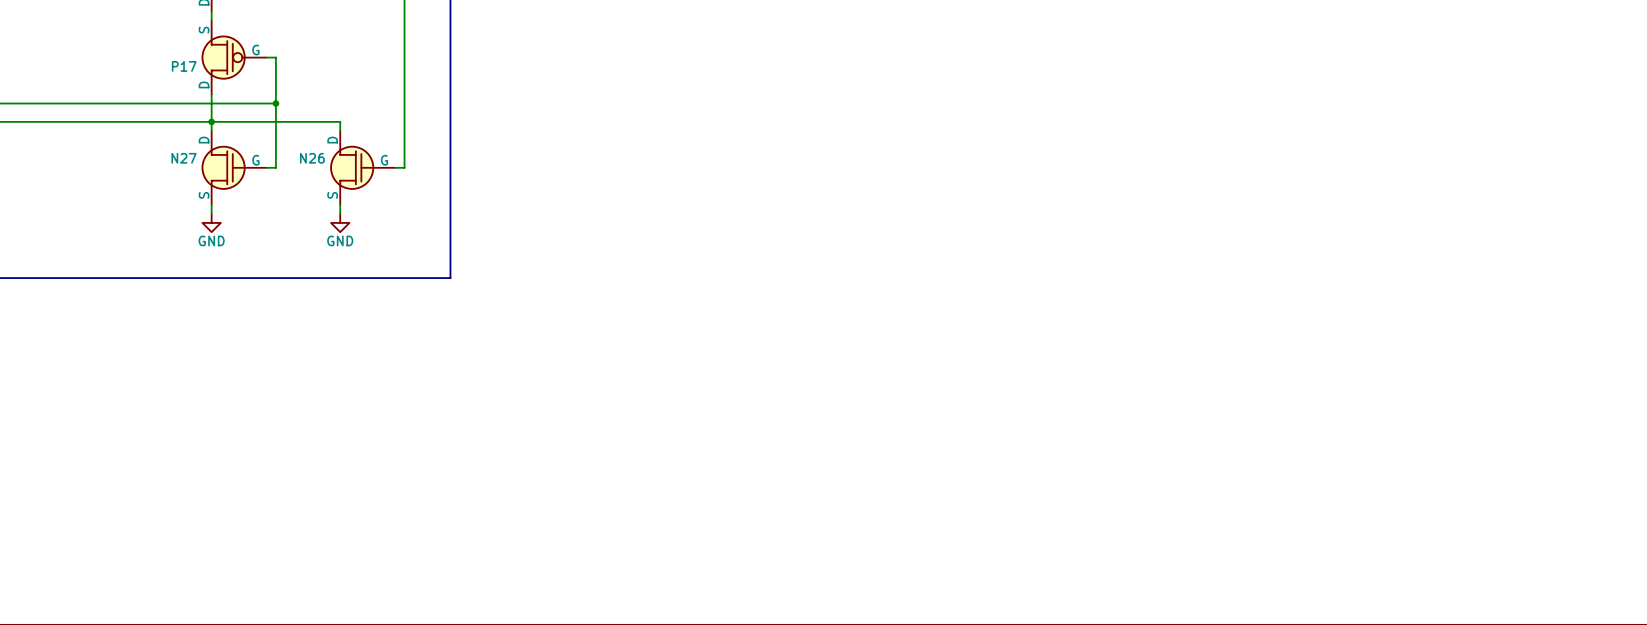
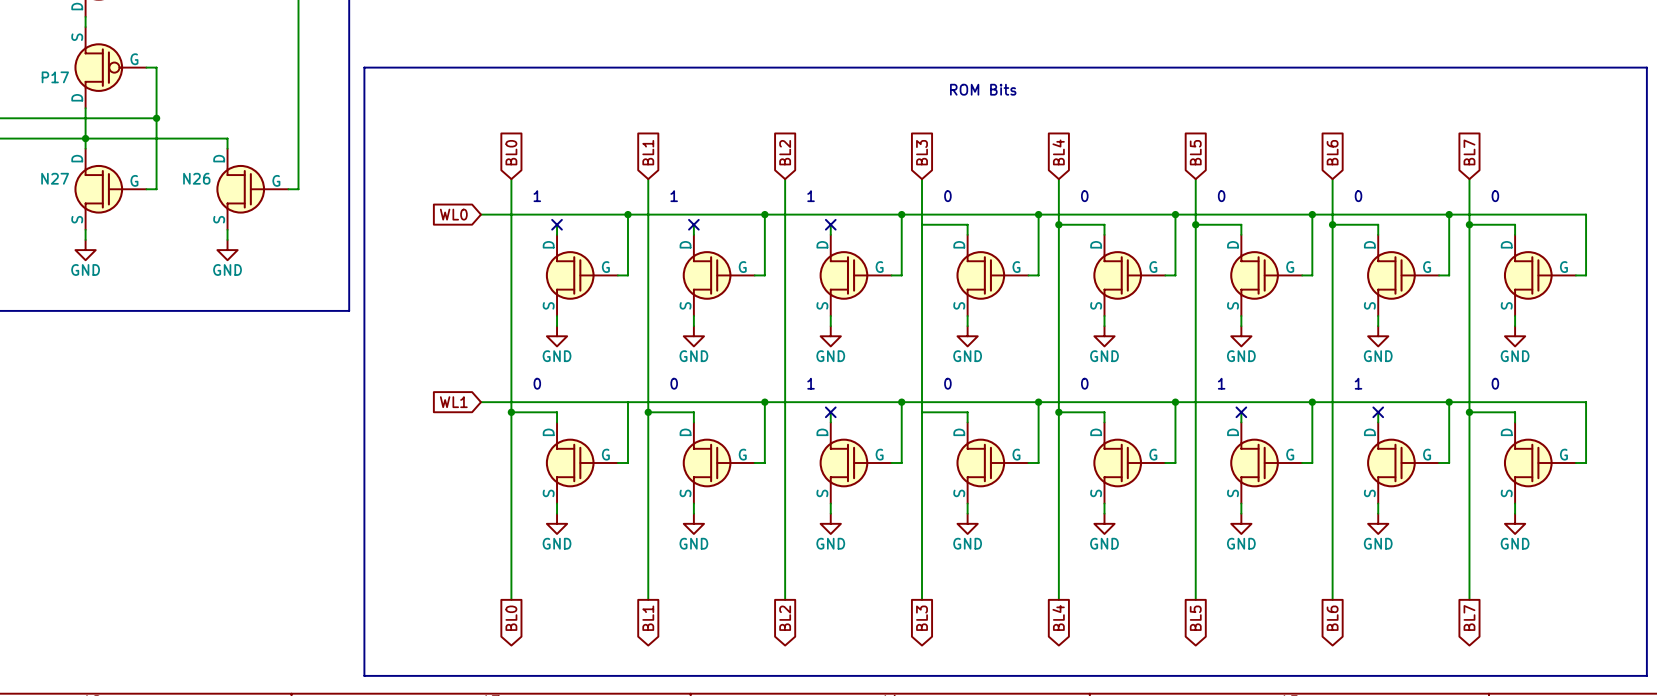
line: none -> (364, 67) (1646, 67) (1646, 675) (364, 675) (364, 67)
text: none -> ROM Bits (983, 89)
global label: none -> BL0 (511, 152)
global label: none -> BL1 (648, 152)
global label: none -> BL2 (785, 152)
global label: none -> BL3 (922, 152)
global label: none -> BL4 (1058, 152)
global label: none -> BL5 (1195, 152)
global label: none -> BL6 (1332, 152)
global label: none -> BL7 (1469, 152)
wire: none -> (511, 179) (511, 599)
wire: none -> (648, 179) (648, 599)
wire: none -> (785, 179) (785, 599)
wire: none -> (922, 179) (922, 599)
wire: none -> (1058, 179) (1058, 599)
wire: none -> (1195, 179) (1195, 599)
wire: none -> (1332, 179) (1332, 599)
wire: none -> (1469, 179) (1469, 599)
text: none -> 1 (537, 196)
text: none -> 1 (674, 196)
text: none -> 1 (811, 196)
text: none -> 0 (947, 196)
text: none -> 0 (1084, 196)
text: none -> 0 (1221, 196)
text: none -> 0 (1358, 196)
text: none -> 0 (1495, 196)
global label: none -> WL0 (453, 214)
wire: none -> (480, 214) (1586, 214) (1586, 275) (1575, 275)
wire: none -> (627, 214) (627, 275) (617, 275)
junction: none -> (627, 214)
wire: none -> (764, 214) (764, 275) (754, 275)
junction: none -> (764, 214)
wire: none -> (901, 214) (901, 275) (891, 275)
junction: none -> (901, 214)
wire: none -> (1038, 214) (1038, 275) (1028, 275)
junction: none -> (1038, 214)
wire: none -> (1175, 214) (1175, 275) (1165, 275)
junction: none -> (1175, 214)
wire: none -> (1312, 214) (1312, 275) (1302, 275)
junction: none -> (1312, 214)
wire: none -> (1449, 214) (1449, 275) (1439, 275)
junction: none -> (1449, 214)
wire: none -> (557, 224) (557, 234)
no-connect mark: none -> (557, 224)
wire: none -> (693, 224) (693, 234)
no-connect mark: none -> (693, 224)
wire: none -> (830, 224) (830, 234)
no-connect mark: none -> (830, 224)
wire: none -> (922, 224) (967, 224) (967, 234)
wire: none -> (1058, 224) (1104, 224) (1104, 234)
junction: none -> (1058, 224)
wire: none -> (1195, 224) (1241, 224) (1241, 234)
junction: none -> (1195, 224)
wire: none -> (1332, 224) (1378, 224) (1378, 234)
junction: none -> (1332, 224)
wire: none -> (1469, 224) (1515, 224) (1515, 234)
junction: none -> (1469, 224)
part: none -> (581, 275)
part: none -> (718, 275)
part: none -> (855, 275)
part: none -> (992, 275)
part: none -> (1129, 275)
part: none -> (1266, 275)
part: none -> (1403, 275)
part: none -> (1539, 275)
wire: none -> (557, 315) (557, 326)
wire: none -> (693, 315) (693, 326)
wire: none -> (830, 315) (830, 326)
wire: none -> (967, 315) (967, 326)
wire: none -> (1104, 315) (1104, 326)
wire: none -> (1241, 315) (1241, 326)
wire: none -> (1378, 315) (1378, 326)
wire: none -> (1515, 315) (1515, 326)
power symbol: none -> GND (557, 336)
power symbol: none -> GND (693, 336)
power symbol: none -> GND (830, 336)
power symbol: none -> GND (967, 336)
power symbol: none -> GND (1104, 336)
power symbol: none -> GND (1241, 336)
power symbol: none -> GND (1378, 336)
power symbol: none -> GND (1515, 336)
text: none -> 0 (537, 383)
text: none -> 0 (674, 383)
text: none -> 1 (811, 383)
text: none -> 0 (947, 383)
text: none -> 0 (1084, 383)
text: none -> 1 (1221, 383)
text: none -> 1 (1358, 383)
text: none -> 0 (1495, 383)
global label: none -> WL1 (453, 402)
wire: none -> (480, 402) (1586, 402) (1586, 463) (1575, 463)
wire: none -> (627, 402) (627, 463) (617, 463)
wire: none -> (764, 402) (764, 463) (754, 463)
junction: none -> (764, 402)
wire: none -> (901, 402) (901, 463) (891, 463)
junction: none -> (901, 402)
wire: none -> (1038, 402) (1038, 463) (1028, 463)
junction: none -> (1038, 402)
wire: none -> (1175, 402) (1175, 463) (1165, 463)
junction: none -> (1175, 402)
wire: none -> (1312, 402) (1312, 463) (1302, 463)
junction: none -> (1312, 402)
wire: none -> (1449, 402) (1449, 463) (1439, 463)
junction: none -> (1449, 402)
wire: none -> (511, 412) (557, 412) (557, 422)
junction: none -> (511, 412)
wire: none -> (648, 412) (693, 412) (693, 422)
junction: none -> (648, 412)
wire: none -> (830, 412) (830, 422)
no-connect mark: none -> (830, 412)
wire: none -> (922, 412) (967, 412) (967, 422)
wire: none -> (1058, 412) (1104, 412) (1104, 422)
junction: none -> (1058, 412)
wire: none -> (1241, 412) (1241, 422)
no-connect mark: none -> (1241, 412)
wire: none -> (1378, 412) (1378, 422)
no-connect mark: none -> (1378, 412)
wire: none -> (1469, 412) (1515, 412) (1515, 422)
junction: none -> (1469, 412)
part: none -> (581, 463)
part: none -> (718, 463)
part: none -> (855, 463)
part: none -> (992, 463)
part: none -> (1129, 463)
part: none -> (1266, 463)
part: none -> (1403, 463)
part: none -> (1539, 463)
wire: none -> (557, 503) (557, 513)
wire: none -> (693, 503) (693, 513)
wire: none -> (830, 503) (830, 513)
wire: none -> (967, 503) (967, 513)
wire: none -> (1104, 503) (1104, 513)
wire: none -> (1241, 503) (1241, 513)
wire: none -> (1378, 503) (1378, 513)
wire: none -> (1515, 503) (1515, 513)
power symbol: none -> GND (557, 523)
power symbol: none -> GND (693, 523)
power symbol: none -> GND (830, 523)
power symbol: none -> GND (967, 523)
power symbol: none -> GND (1104, 523)
power symbol: none -> GND (1241, 523)
power symbol: none -> GND (1378, 523)
power symbol: none -> GND (1515, 523)
global label: none -> BL0 (511, 618)
global label: none -> BL1 (648, 618)
global label: none -> BL2 (785, 618)
global label: none -> BL3 (922, 618)
global label: none -> BL4 (1058, 617)
global label: none -> BL5 (1195, 618)
global label: none -> BL6 (1332, 618)
global label: none -> BL7 (1469, 617)

